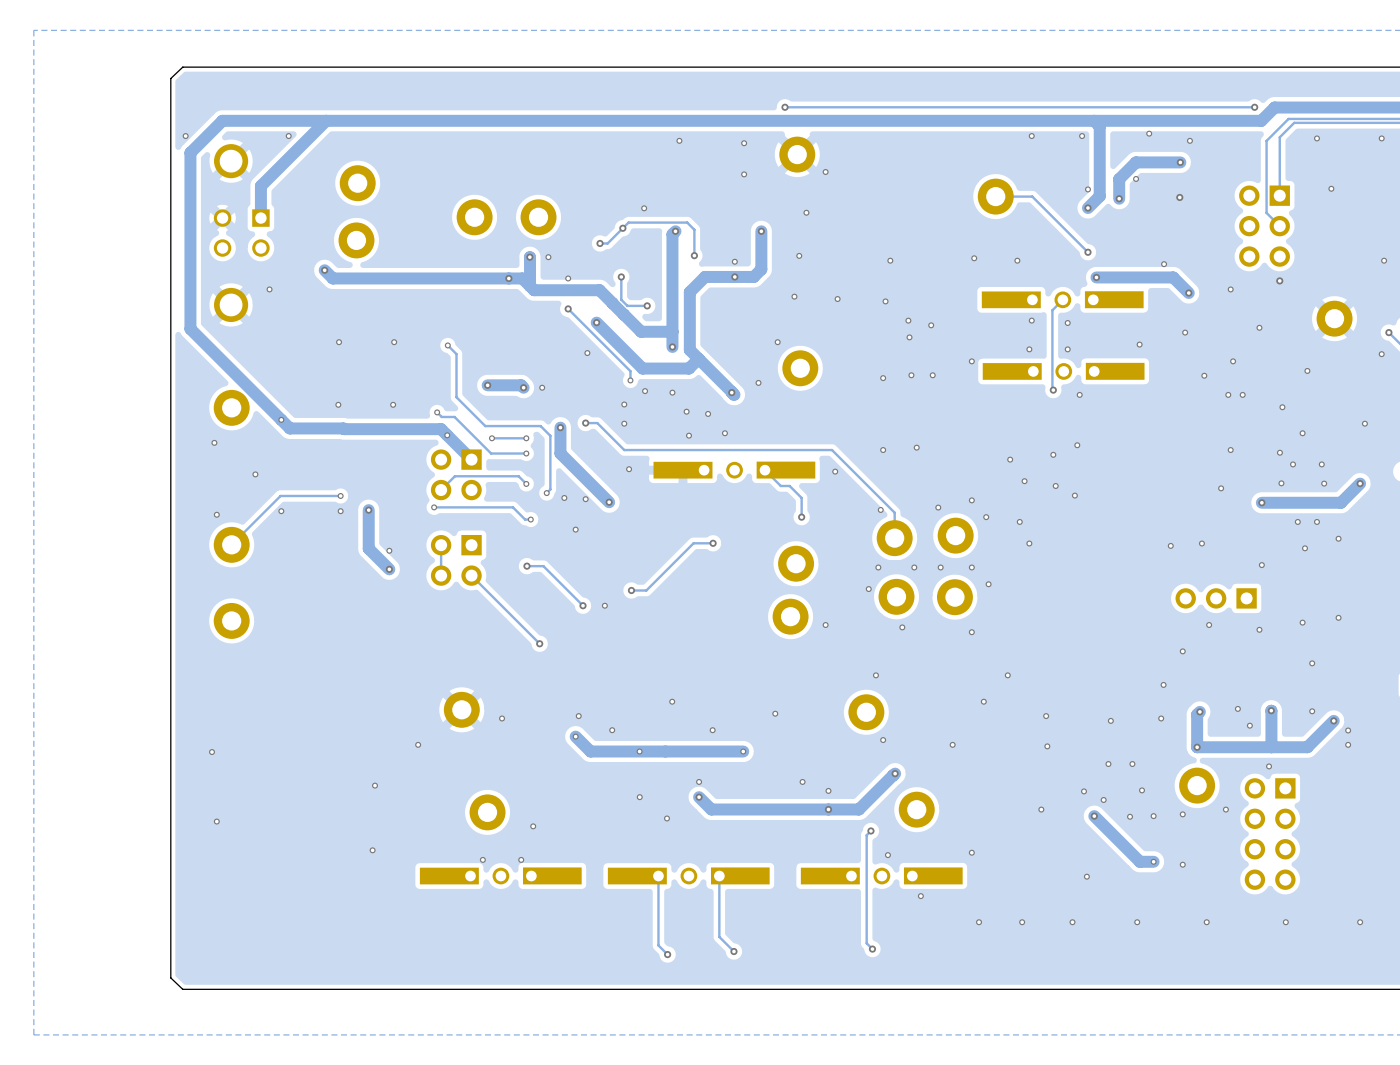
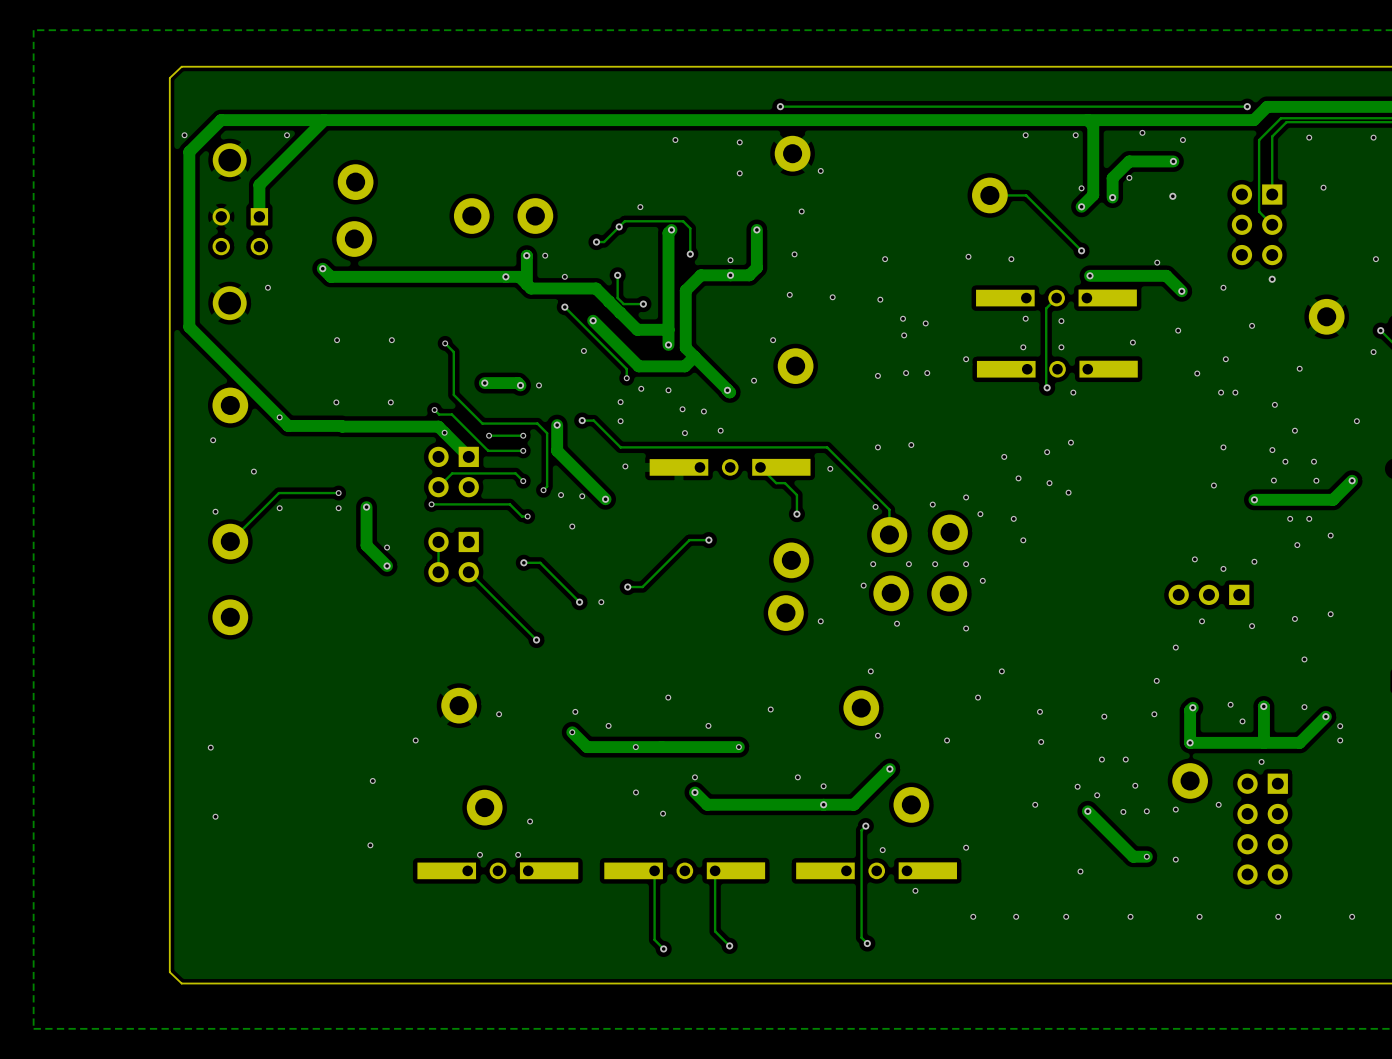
via: (1201, 543) -> none
via: (1170, 545) -> none
via: none -> (1194, 559)
via: none -> (1223, 568)

